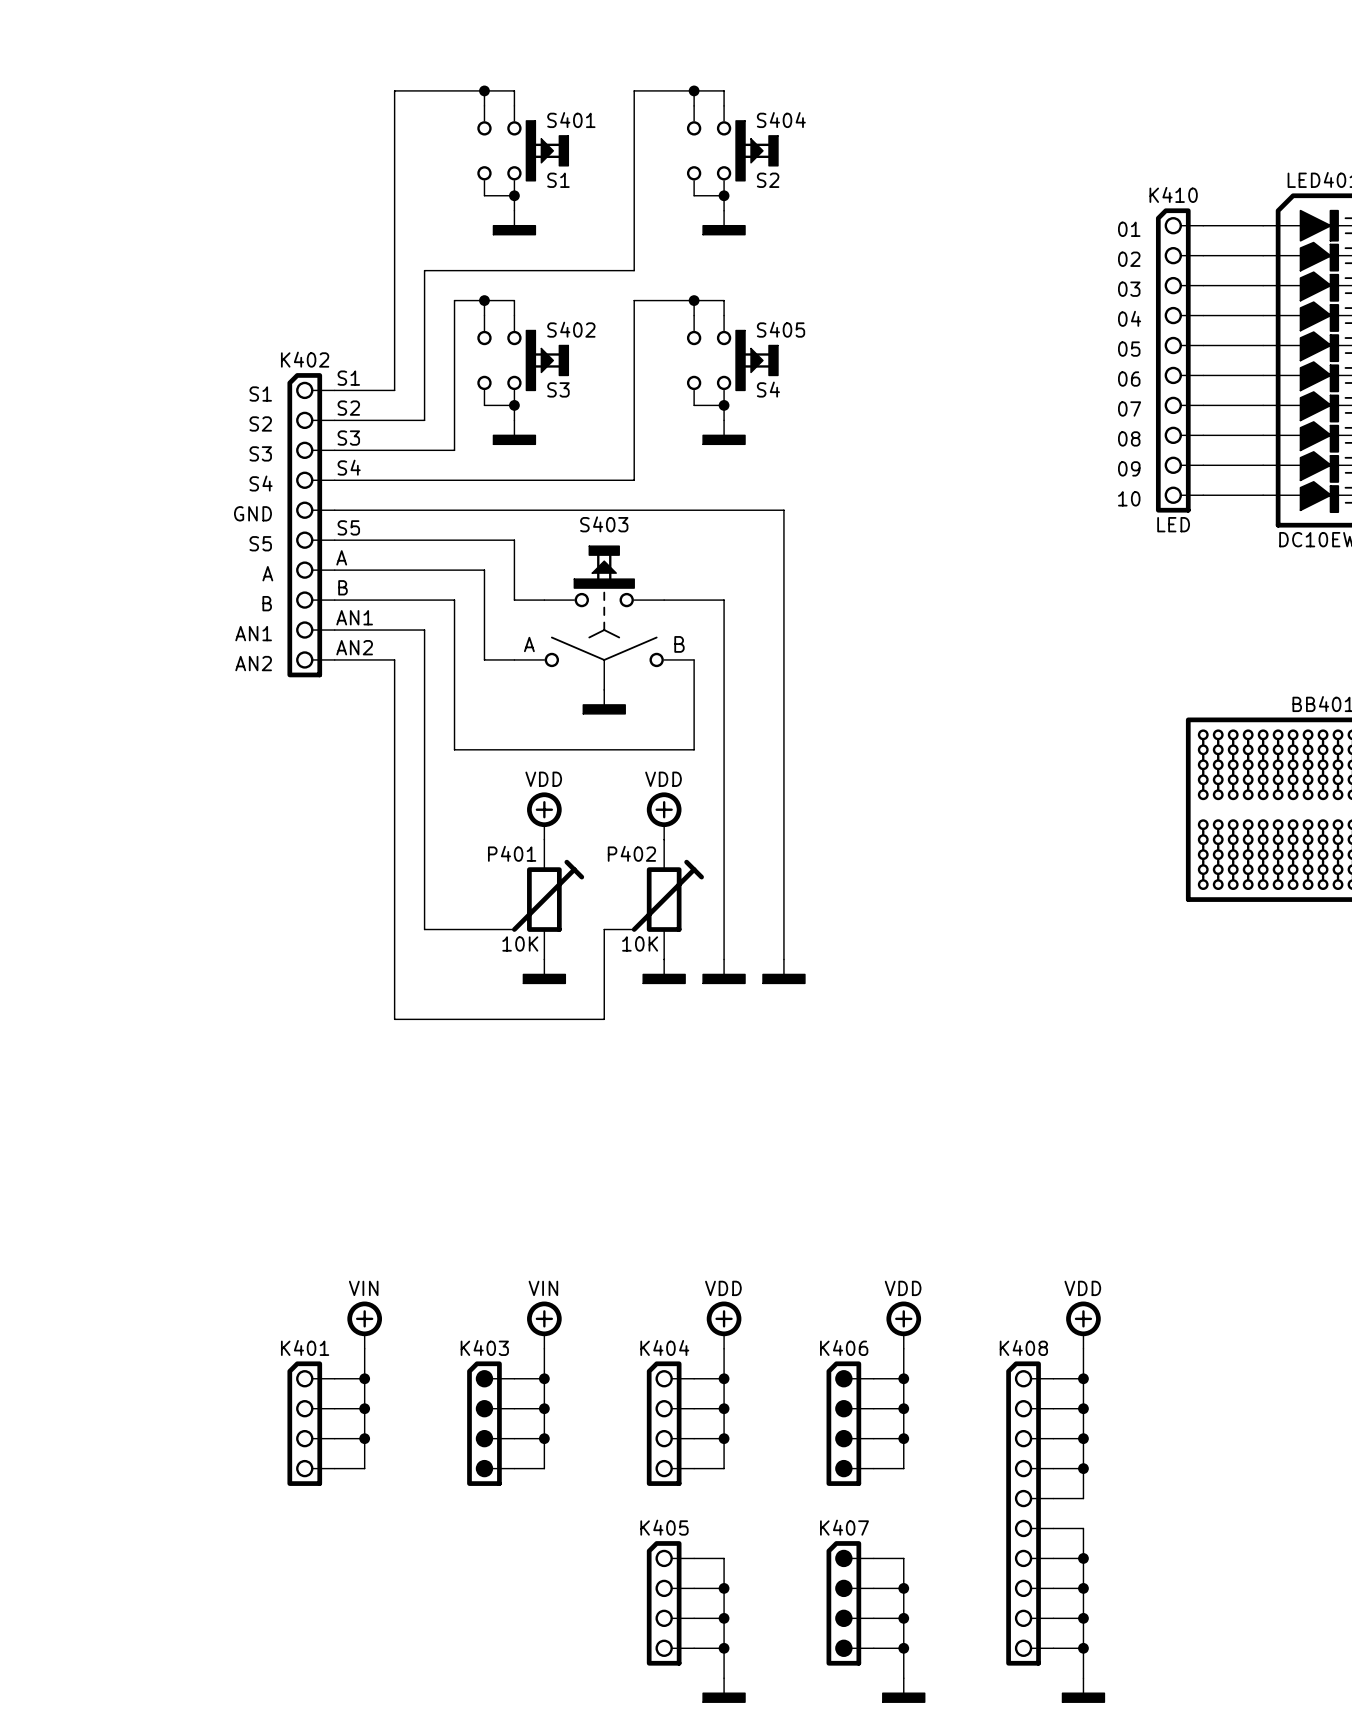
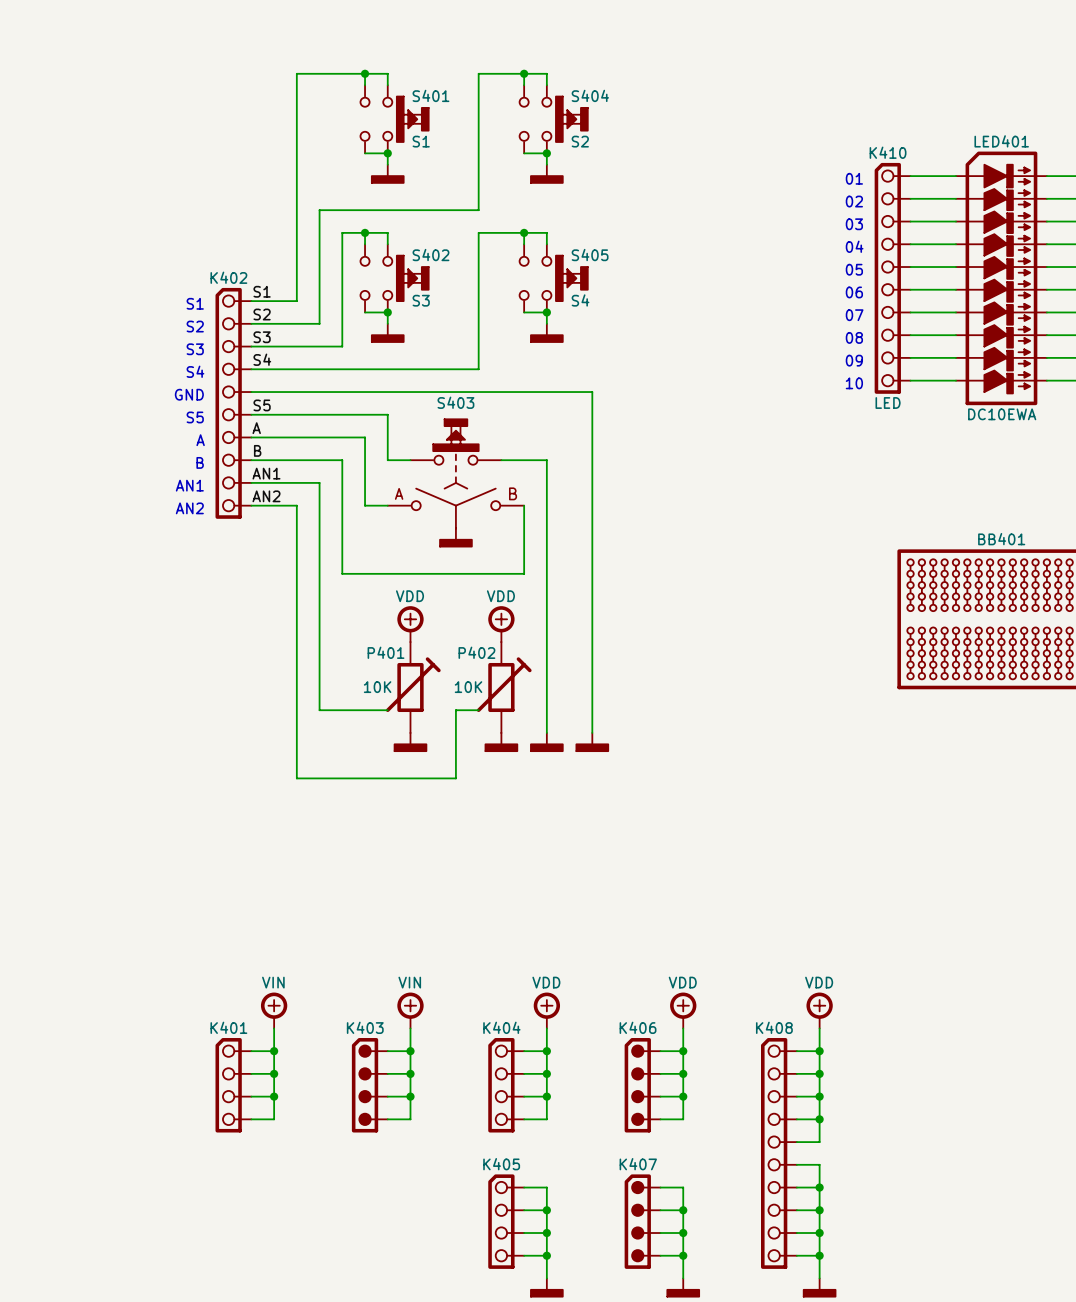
P401 text: none -> 10K (377, 687)
P402 text: none -> 10K (468, 687)
P401 text: 10K (520, 943) -> none
P402 text: 10K (640, 943) -> none

